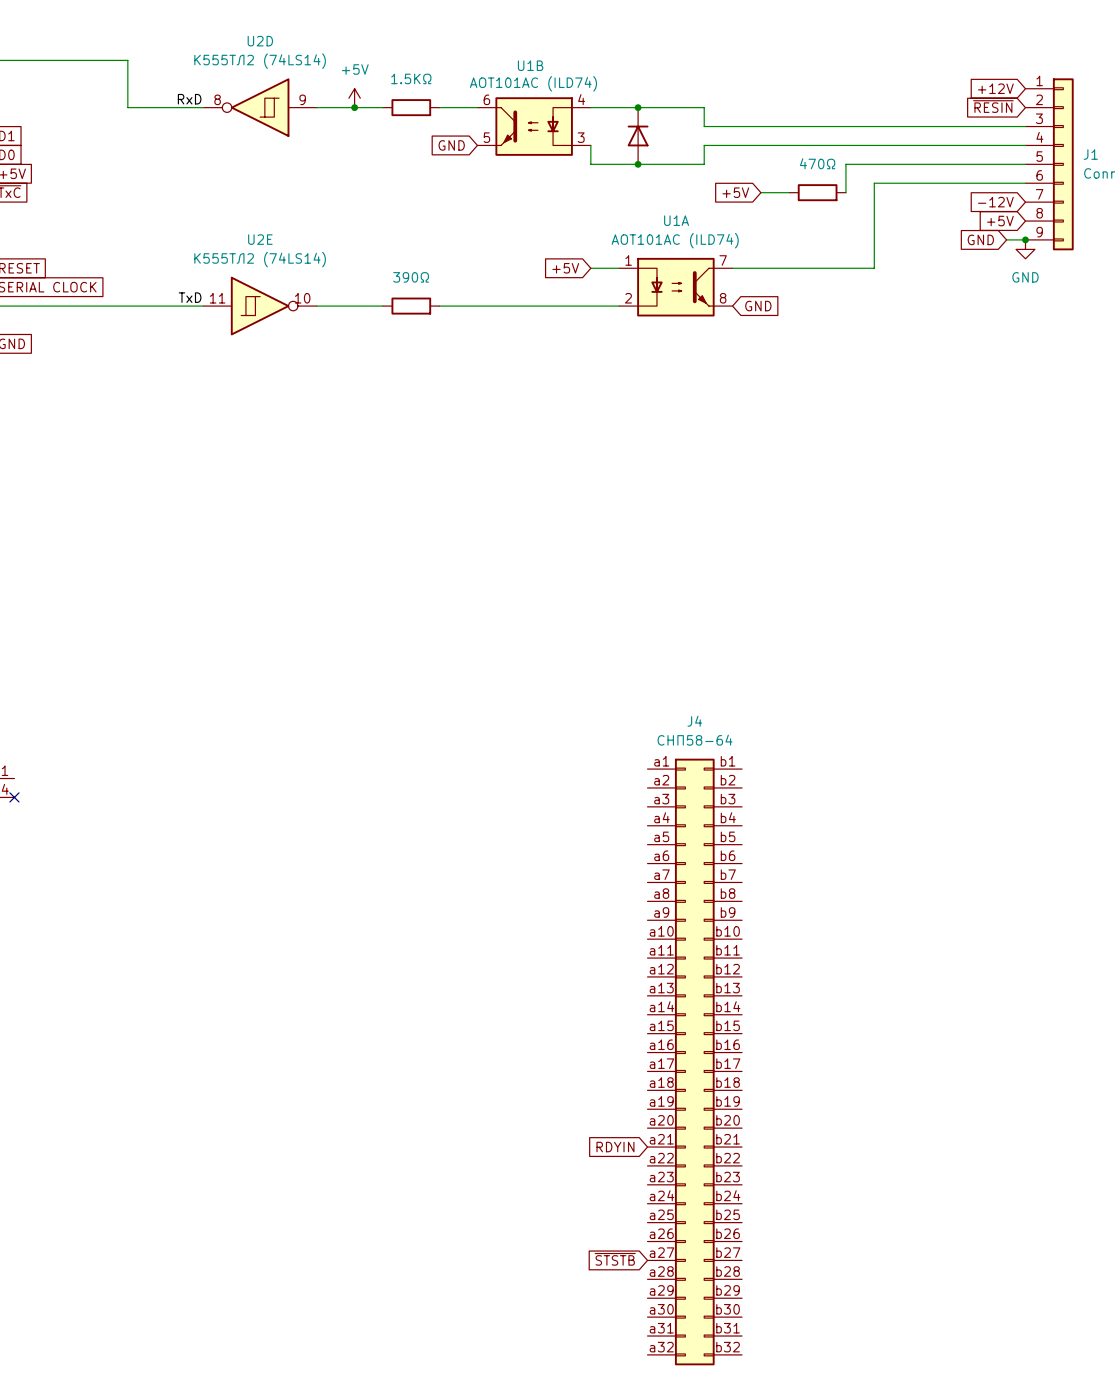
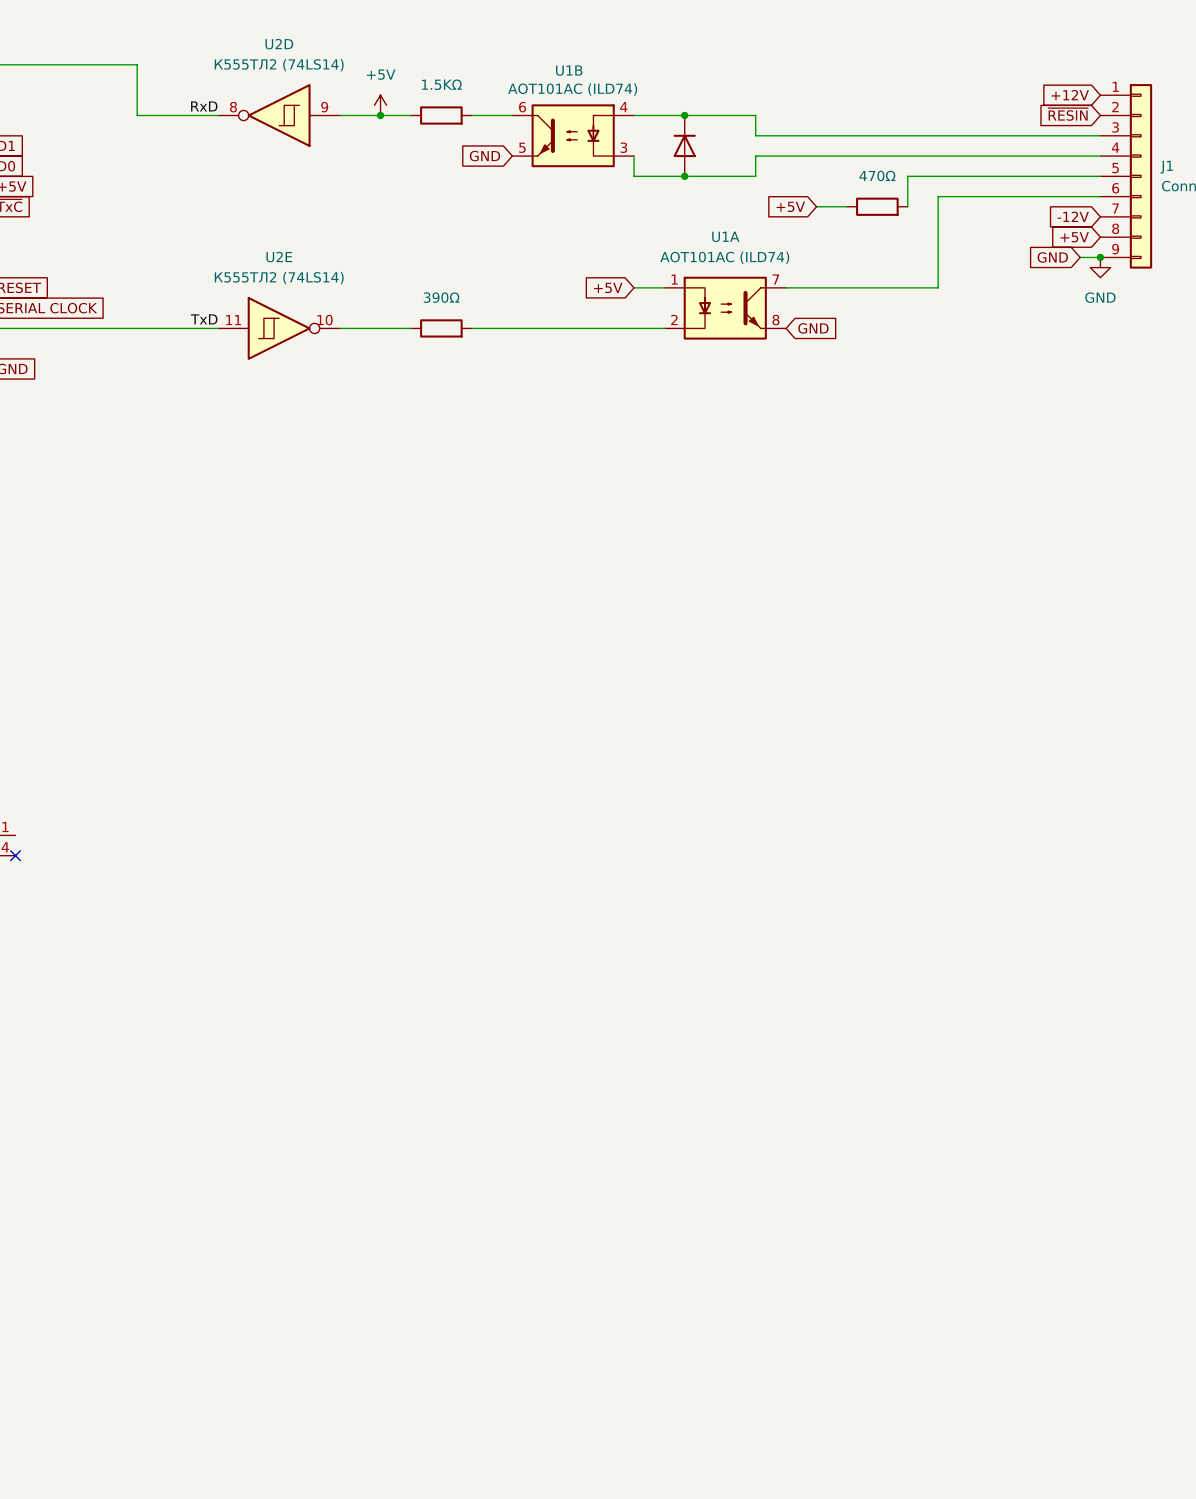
J4: СНП58-64 (694, 1061) -> none
global label: RDYIN (615, 1147) -> none
global label: ~{STSTB} (615, 1259) -> none

